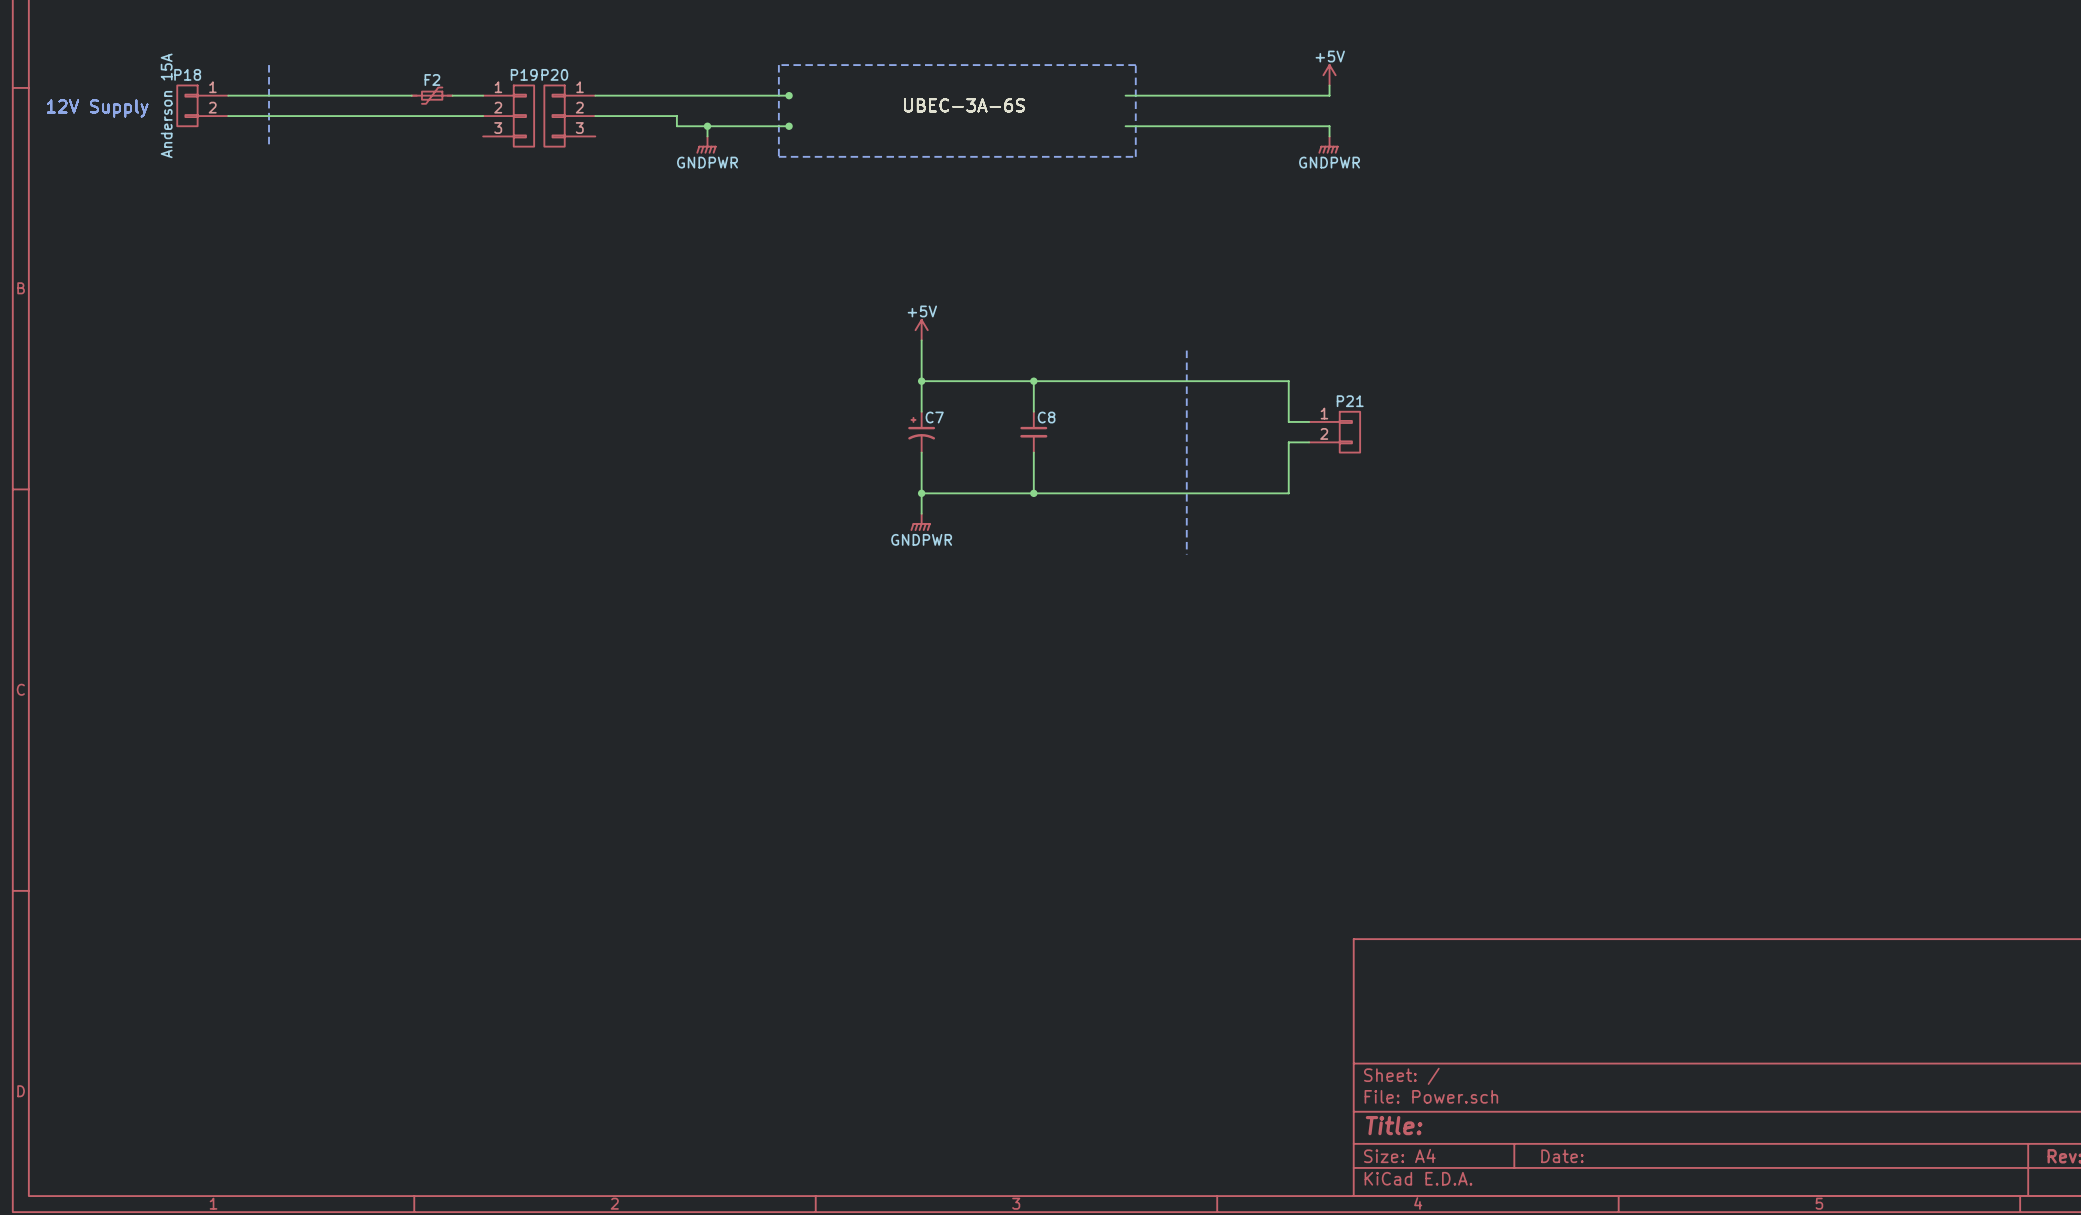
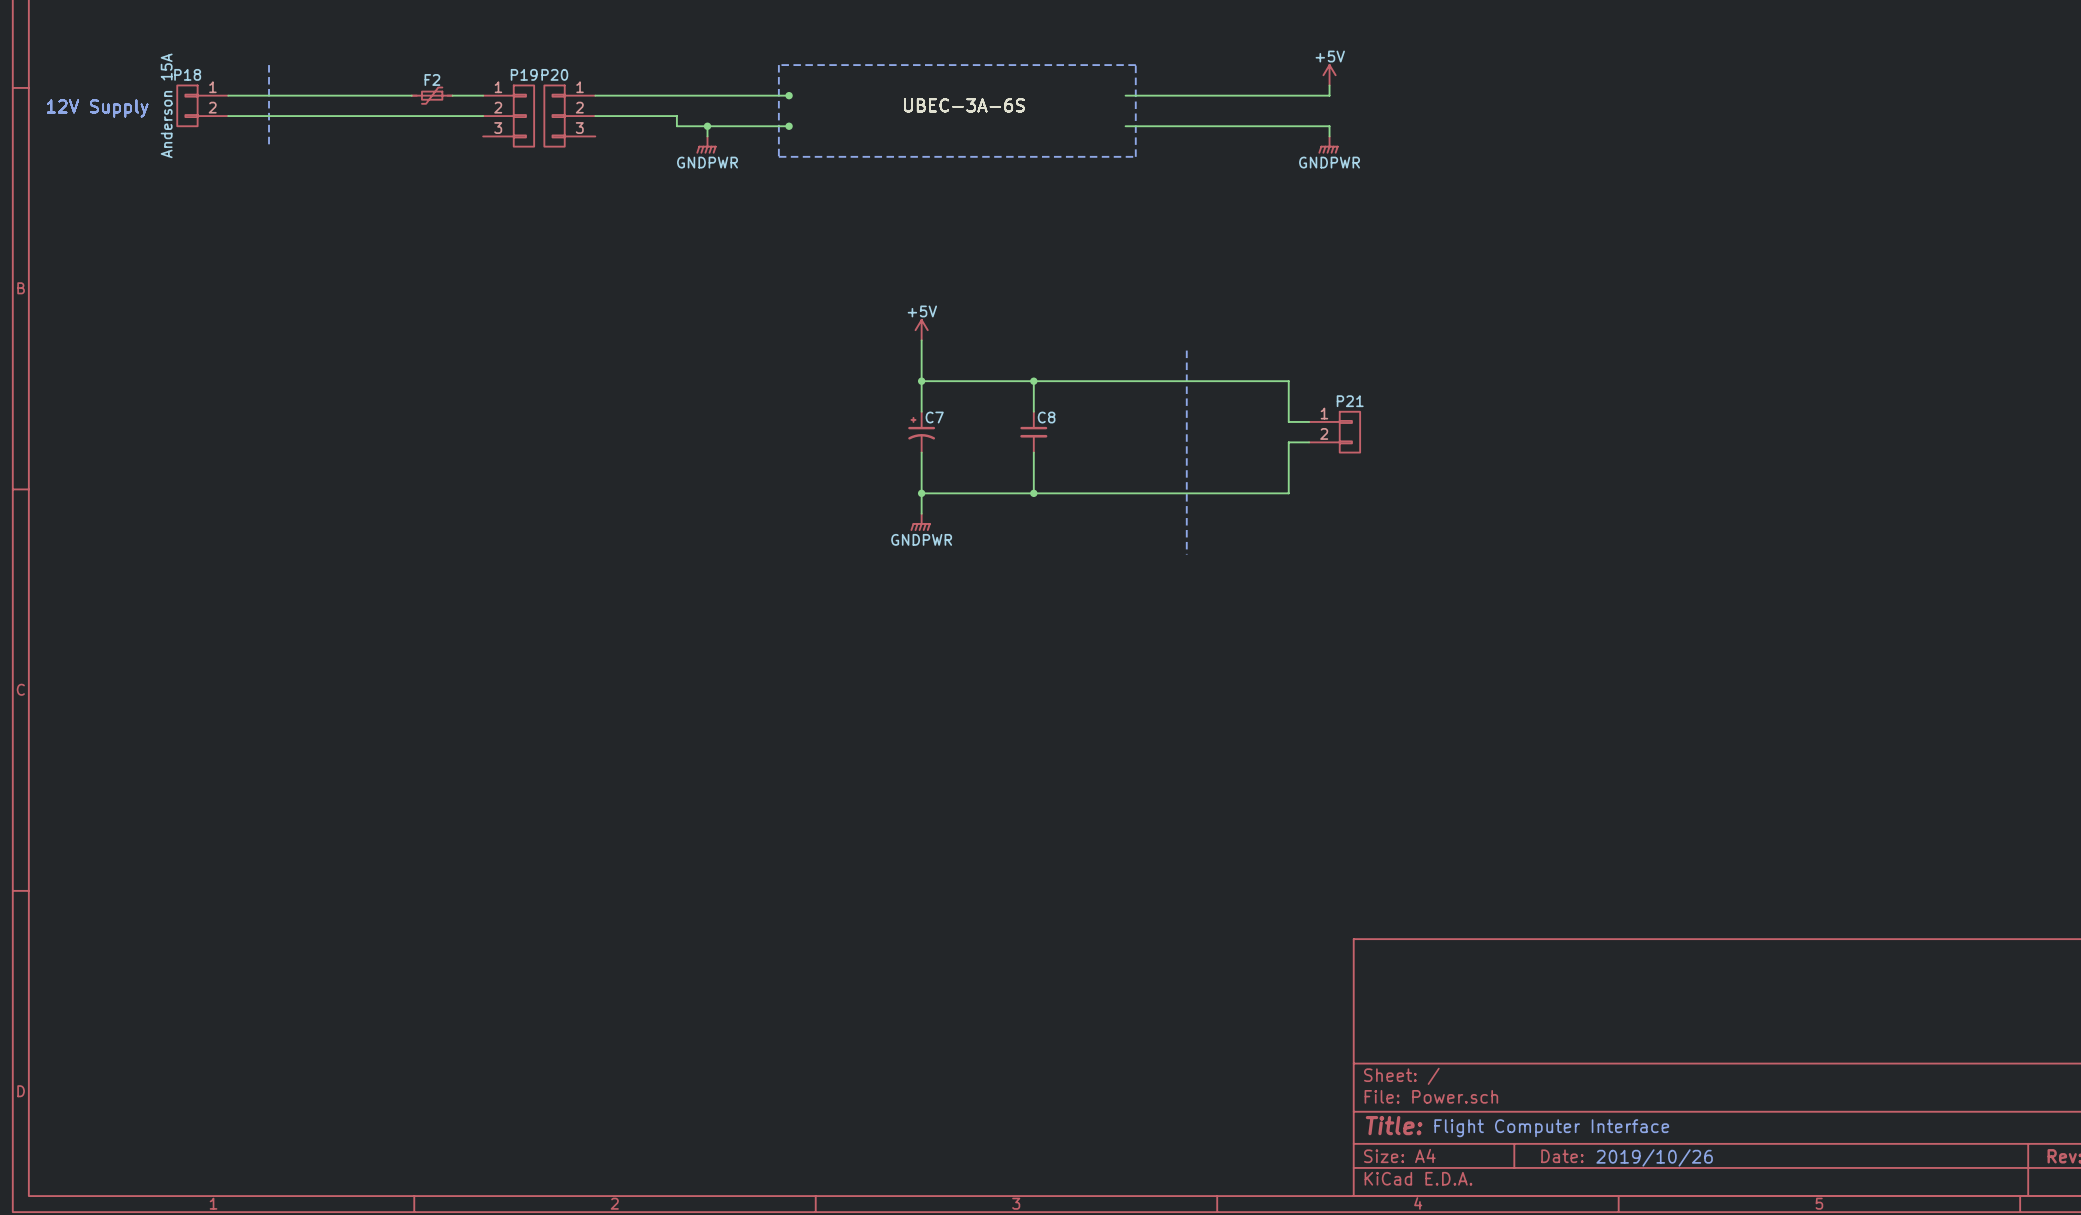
text: none -> Flight Computer Interface (1551, 1128)
text: none -> 2019/10/26 (1654, 1157)

